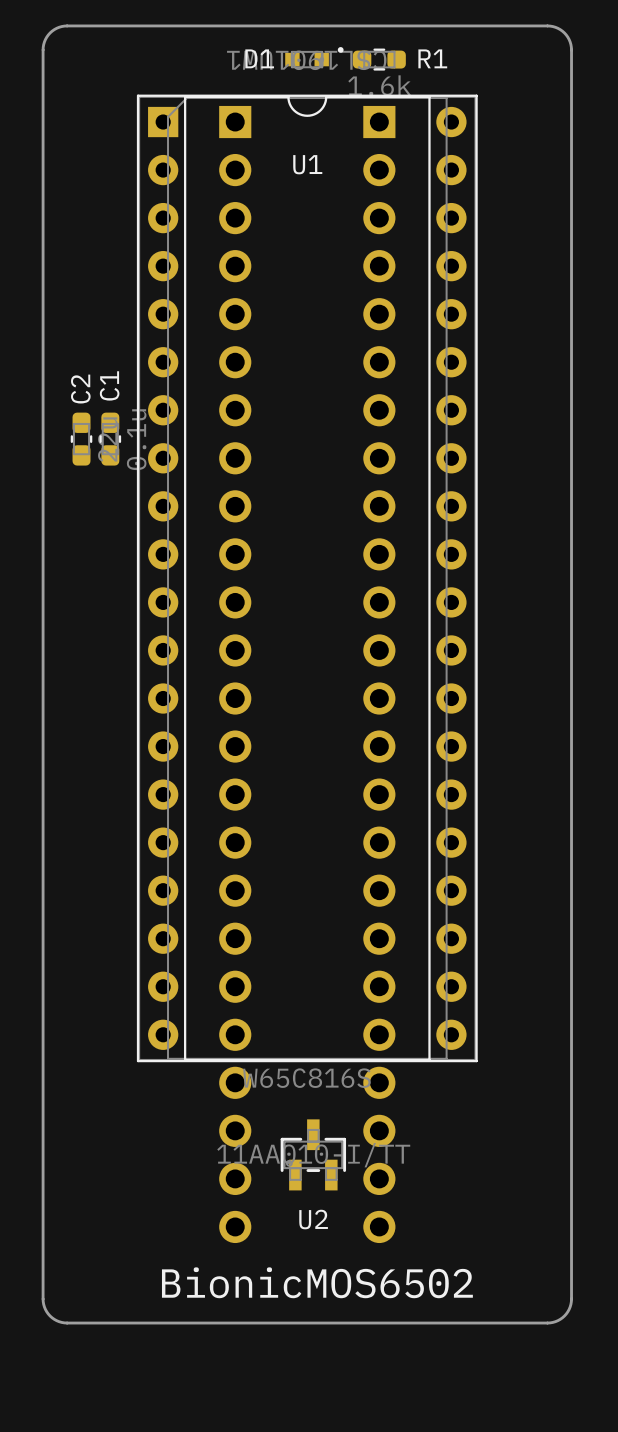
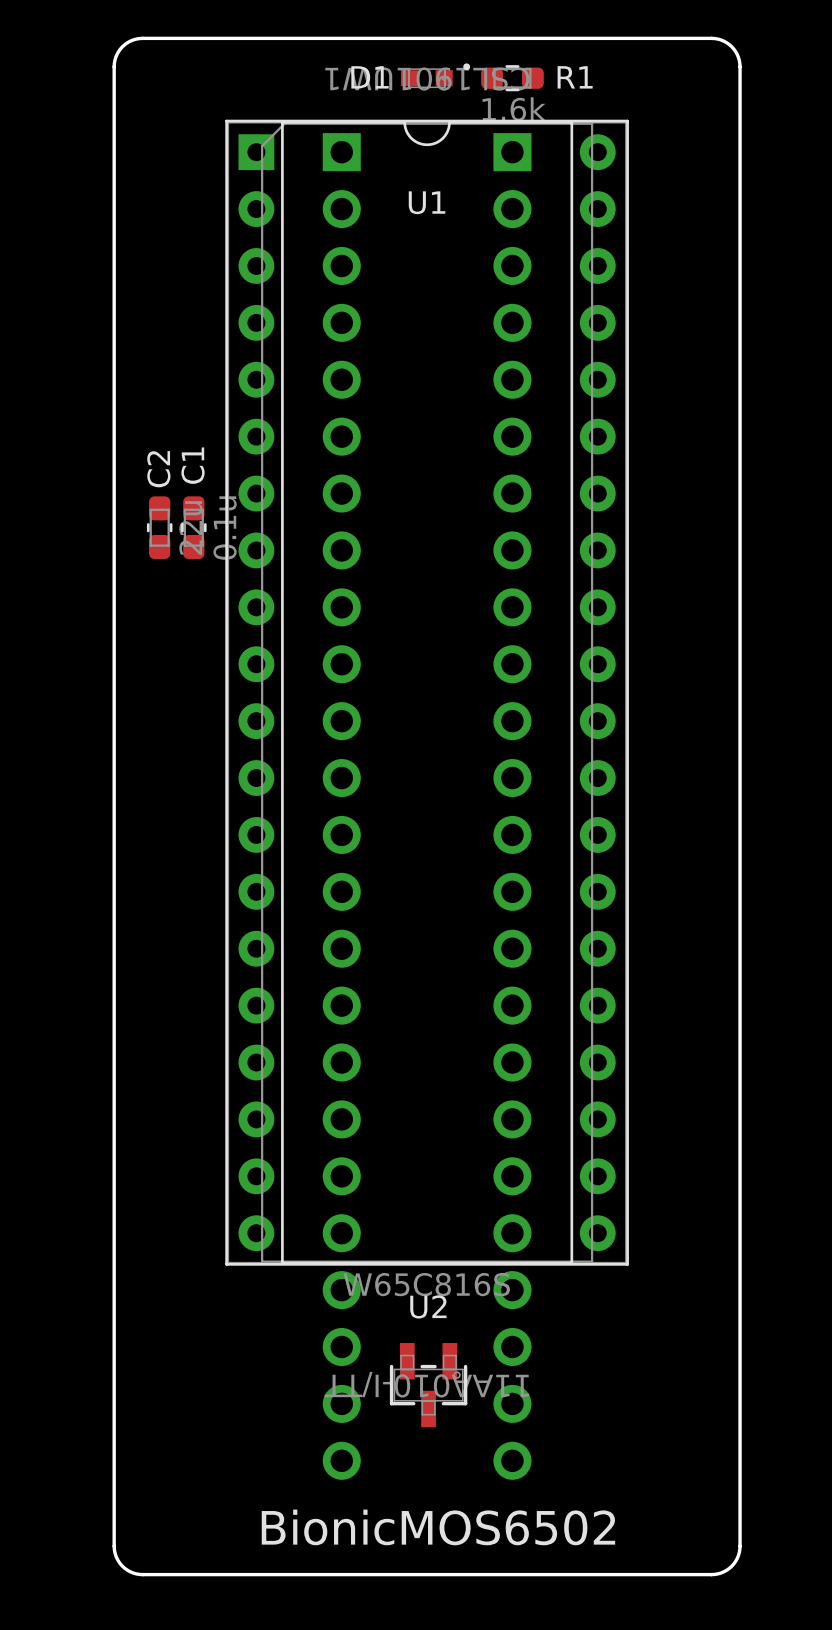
U2 rotation: 0° (313, 1154) -> 180° (428, 1385)

